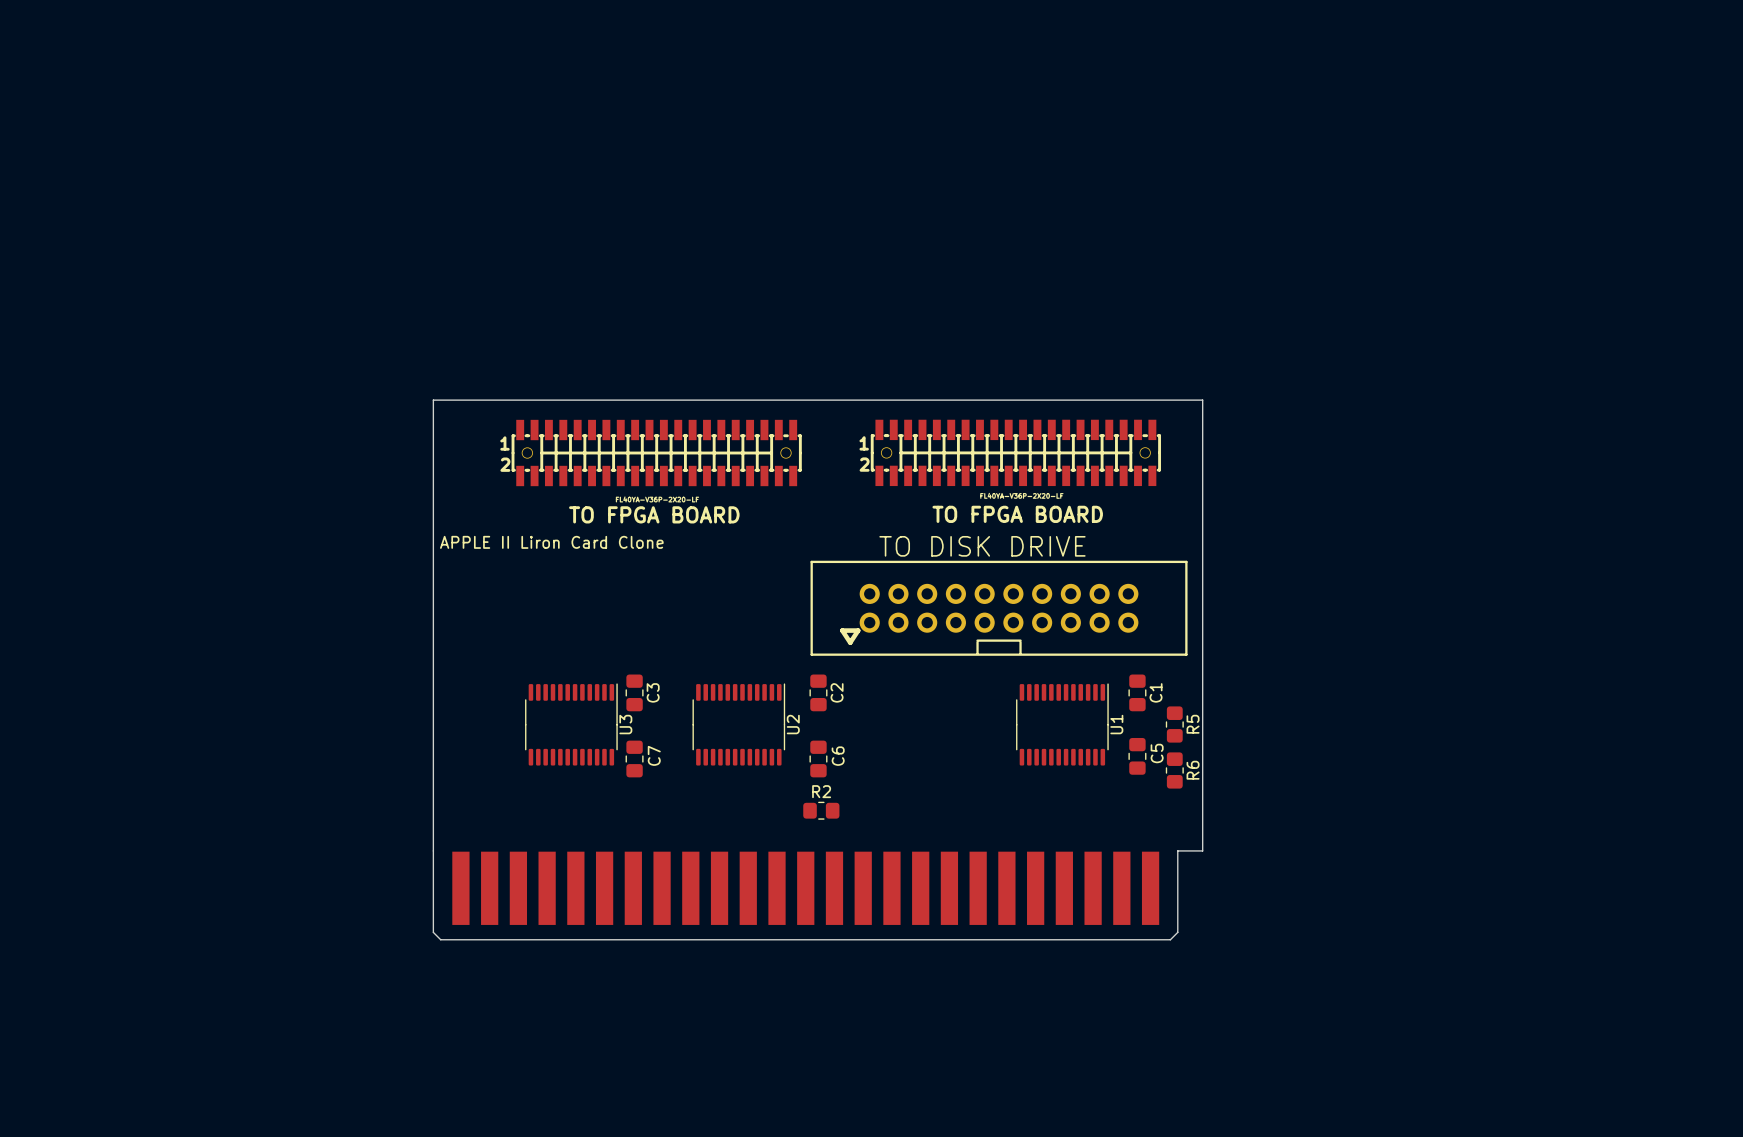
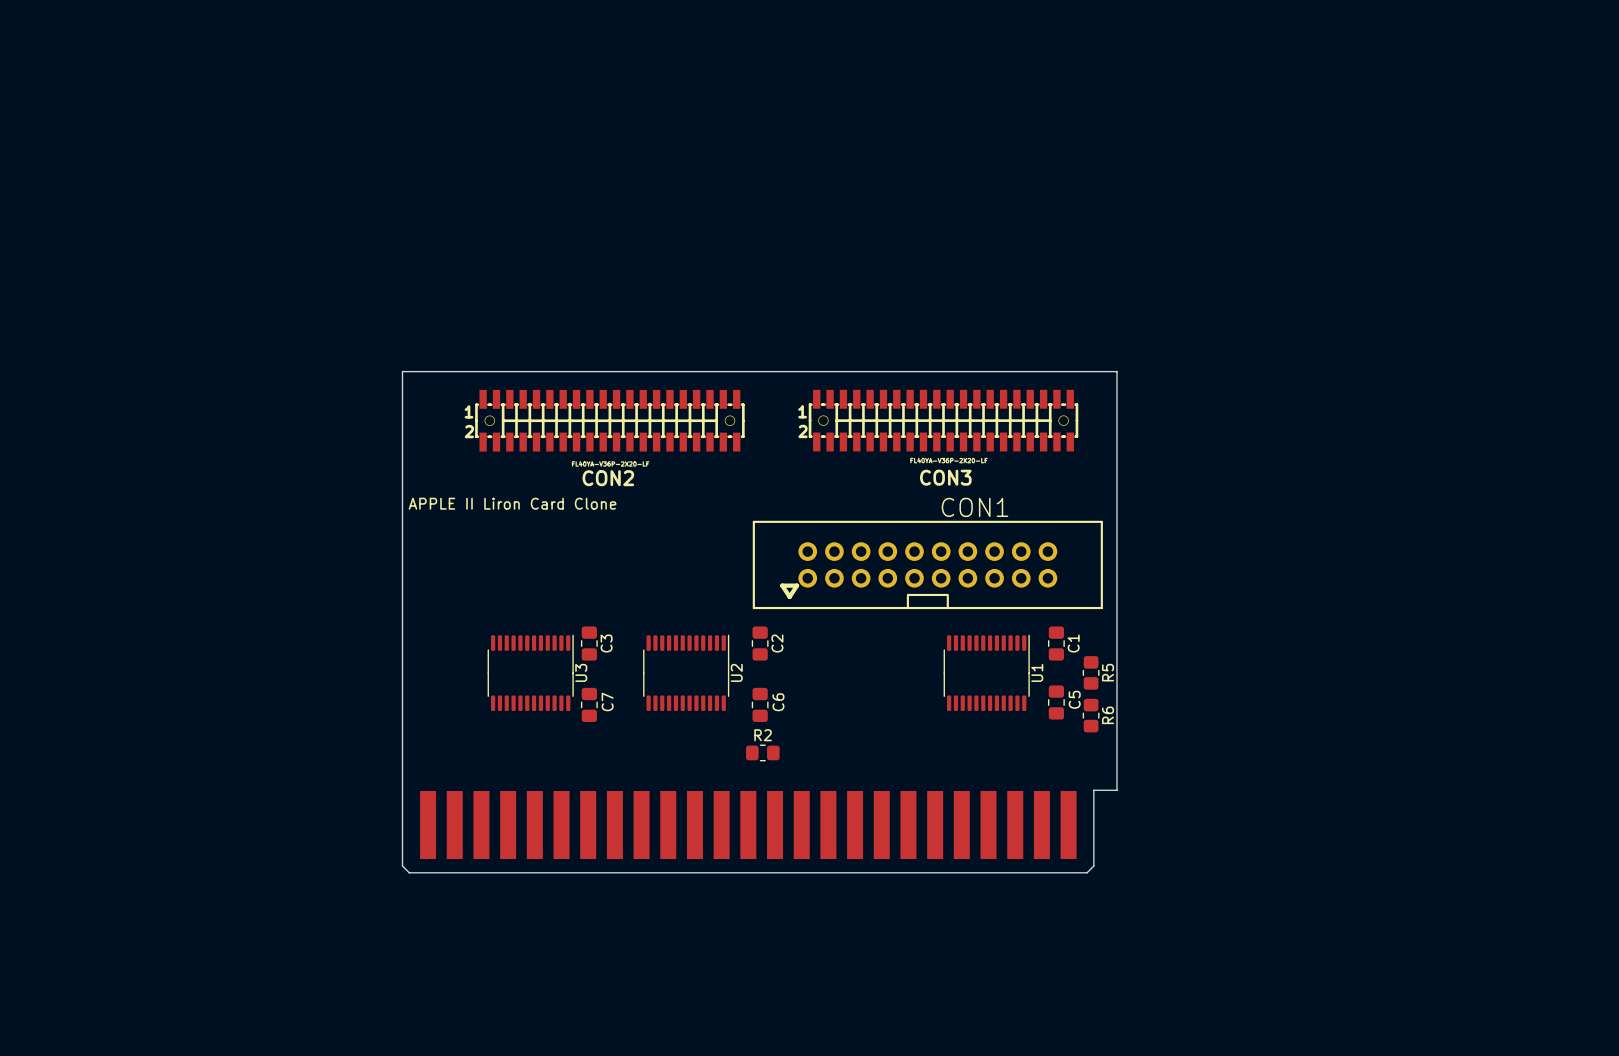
TO FPGA BOARD name: TO FPGA BOARD (654, 514) -> CON2 (608, 478)
TO FPGA BOARD name: TO FPGA BOARD (1017, 514) -> CON3 (945, 477)
TO DISK DRIVE name: TO DISK DRIVE (982, 546) -> CON1 (975, 507)

